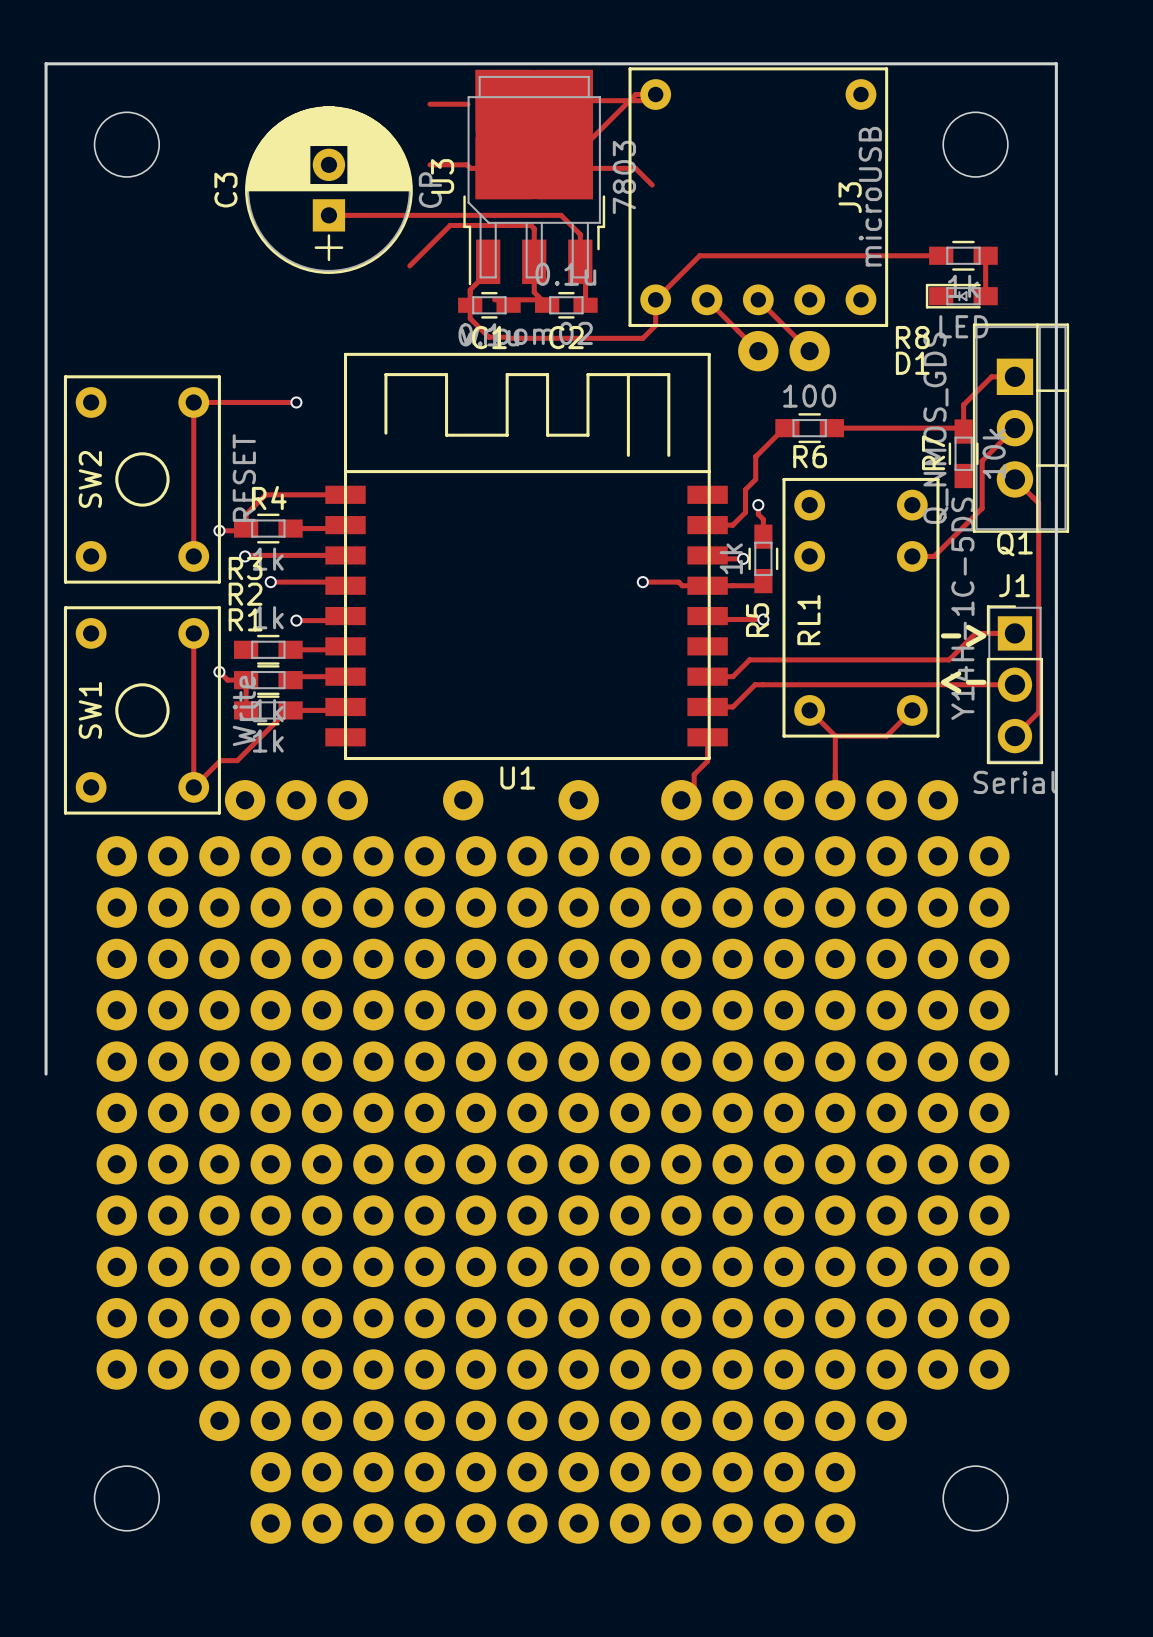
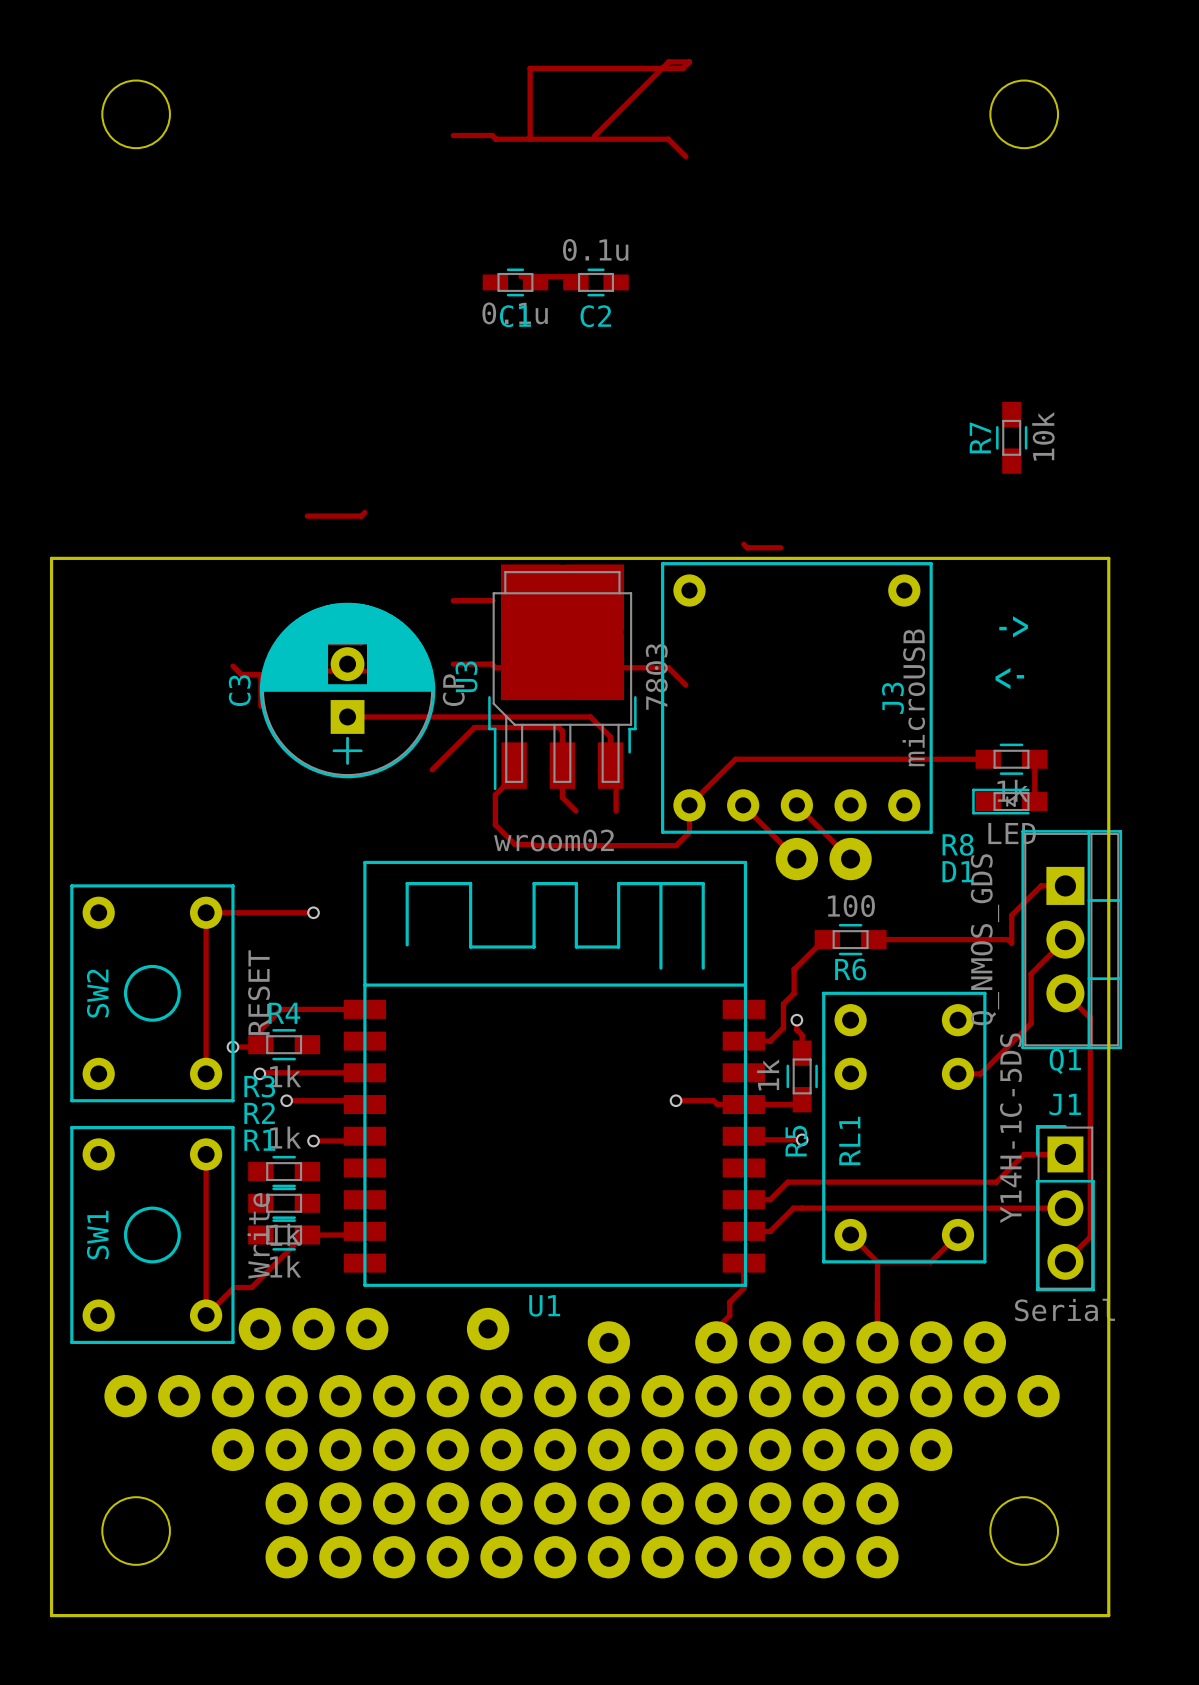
track: (429, 104) (467, 104) -> none
U3 position: (534, 177) -> (562, 677)
C3 position: (328, 190) -> (347, 690)
J3 position: (758, 197) -> (796, 697)
track: (328, 215) (561, 215) (580, 234) (580, 261) (585, 267) (585, 305) -> none
track: (941, 255) (699, 255) (655, 299) (655, 325) (642, 338) (488, 337) (470, 318) (470, 289) (488, 271) (488, 261) -> none
R8 position: (963, 255) -> (1011, 759)
track: (985, 255) (985, 296) -> none
track: (409, 265) (450, 225) (531, 225) (534, 228) (534, 292) (547, 305) -> none
D1 position: (961, 296) -> (1009, 801)
track: (707, 299) (758, 351) -> none
track: (758, 299) (809, 351) -> none
part: (758, 351) -> none
part: (809, 351) -> none
track: (1014, 376) (991, 376) (963, 404) (963, 431) (960, 428) (831, 428) -> none
track: (296, 402) (193, 402) (193, 556) -> none
via: (296, 402) -> none
track: (787, 428) (784, 428) (756, 456) -> none
R6 position: (809, 428) -> (850, 939)
track: (1014, 428) (982, 460) (982, 508) (934, 556) (912, 556) -> none
Q1 position: (1021, 428) -> (1071, 939)
track: (755, 456) (755, 479) (745, 489) (745, 512) (732, 525) (707, 525) -> none
SW2 position: (142, 479) -> (152, 993)
track: (1014, 479) (1038, 503) (1038, 712) (1014, 736) -> none
track: (345, 494) (265, 494) (246, 514) (246, 528) (243, 530) (219, 530) -> none
track: (758, 505) (758, 514) (763, 519) (763, 536) -> none
via: (758, 505) -> none
R4 position: (268, 528) -> (284, 1044)
via: (219, 530) -> none
track: (345, 555) (245, 556) -> none
via: (245, 556) -> none
U1 position: (526, 556) -> (554, 1073)
via: (743, 558) -> none
R5 position: (763, 558) -> (802, 1076)
board edge: (46, 568) (46, 63) (1056, 63) (1056, 568) -> (51, 558) (1108, 558)
track: (763, 581) (761, 585) (682, 585) (678, 582) (642, 582) -> none
track: (270, 582) (341, 582) (345, 585) -> none
via: (270, 582) -> none
via: (642, 582) -> none
RL1 position: (860, 607) -> (904, 1127)
track: none -> (453, 600) (493, 600)
track: (345, 616) (340, 620) (296, 620) -> none
track: (707, 616) (711, 619) (763, 619) -> none
via: (763, 619) -> none
via: (296, 620) -> none
track: (193, 633) (193, 787) (220, 760) (237, 760) (287, 710) (342, 710) (345, 706) -> none
track: (1014, 633) (975, 633) (949, 659) (749, 659) (732, 676) (707, 676) -> none
R3 position: (268, 649) -> (284, 1171)
track: none -> (453, 664) (492, 664) (495, 667) (668, 667) (685, 685)
via: (219, 671) -> none
R2 position: (268, 680) -> (284, 1203)
track: (1014, 684) (755, 684) (732, 706) (707, 706) -> none
J1 position: (1014, 684) -> (1065, 1208)
SW1 position: (142, 710) -> (152, 1235)
R1 position: (268, 710) -> (284, 1235)
track: (809, 710) (835, 736) -> none
track: (912, 710) (886, 736) (835, 736) -> none
track: none -> (347, 716) (590, 716) (610, 737) (610, 765) (616, 771) (616, 811)
track: (835, 736) (835, 800) -> none
track: (707, 737) (707, 761) (694, 774) (694, 787) (681, 800) -> none
track: none -> (988, 759) (735, 759) (689, 805) (689, 832) (676, 845) (514, 844) (495, 824) (495, 794) (514, 776) (514, 765)
track: none -> (1034, 759) (1034, 801)
track: none -> (432, 769) (474, 727) (559, 727) (562, 730) (562, 797) (575, 811)
part: (245, 800) -> none
part: (296, 800) -> none
part: (347, 800) -> none
part: (463, 800) -> none
part: (578, 800) -> none
part: (681, 800) -> none
part: (732, 800) -> none
part: (783, 800) -> none
part: (835, 800) -> none
part: (886, 800) -> none
part: (937, 800) -> none
track: none -> (743, 805) (796, 859)
track: none -> (796, 805) (850, 859)
part: (116, 856) -> none
part: (168, 856) -> none
part: (219, 856) -> none
part: (270, 856) -> none
part: (322, 856) -> none
part: (373, 856) -> none
part: (424, 856) -> none
part: (476, 856) -> none
part: (527, 856) -> none
part: (578, 856) -> none
part: (630, 856) -> none
part: (681, 856) -> none
part: (732, 856) -> none
part: none -> (796, 859)
part: (783, 856) -> none
part: none -> (850, 859)
part: (835, 856) -> none
part: (886, 856) -> none
part: (937, 856) -> none
part: (989, 856) -> none
track: none -> (1065, 885) (1041, 885) (1011, 915) (1011, 943) (1008, 939) (873, 939)
part: (116, 907) -> none
part: (168, 907) -> none
part: (219, 907) -> none
part: (270, 907) -> none
track: none -> (313, 912) (206, 912) (206, 1073)
via: none -> (313, 912)
part: (322, 907) -> none
part: (373, 907) -> none
part: (424, 907) -> none
part: (476, 907) -> none
part: (527, 907) -> none
part: (578, 907) -> none
part: (630, 907) -> none
part: (681, 907) -> none
part: (732, 907) -> none
part: (783, 907) -> none
part: (835, 907) -> none
part: (886, 907) -> none
part: (937, 907) -> none
part: (989, 907) -> none
track: none -> (827, 939) (824, 939) (794, 969)
track: none -> (1065, 939) (1031, 973) (1031, 1023) (980, 1073) (958, 1073)
part: (116, 958) -> none
part: (168, 958) -> none
part: (219, 958) -> none
part: (270, 958) -> none
part: (322, 958) -> none
part: (373, 958) -> none
part: (424, 958) -> none
part: (476, 958) -> none
part: (527, 958) -> none
part: (578, 958) -> none
part: (630, 958) -> none
part: (681, 958) -> none
part: (732, 958) -> none
part: (783, 958) -> none
part: (835, 958) -> none
part: (886, 958) -> none
part: (937, 958) -> none
part: (989, 958) -> none
track: none -> (794, 969) (794, 993) (783, 1004) (783, 1027) (770, 1041) (743, 1041)
track: none -> (1065, 993) (1090, 1018) (1090, 1237) (1065, 1261)
track: none -> (364, 1009) (281, 1009) (260, 1029) (260, 1044) (258, 1047) (232, 1047)
part: (116, 1010) -> none
part: (168, 1010) -> none
part: (219, 1010) -> none
part: (270, 1010) -> none
part: (322, 1010) -> none
part: (373, 1010) -> none
part: (424, 1010) -> none
part: (476, 1010) -> none
part: (527, 1010) -> none
part: (578, 1010) -> none
part: (630, 1010) -> none
part: (681, 1010) -> none
part: (732, 1010) -> none
track: none -> (796, 1020) (796, 1029) (802, 1035) (802, 1053)
via: none -> (796, 1020)
part: (783, 1010) -> none
part: (835, 1010) -> none
part: (886, 1010) -> none
part: (937, 1010) -> none
part: (989, 1010) -> none
via: none -> (232, 1047)
track: none -> (364, 1072) (259, 1073)
part: (116, 1061) -> none
part: (168, 1061) -> none
part: (219, 1061) -> none
via: none -> (259, 1073)
part: (270, 1061) -> none
part: (322, 1061) -> none
part: (373, 1061) -> none
part: (424, 1061) -> none
part: (476, 1061) -> none
part: (527, 1061) -> none
part: (578, 1061) -> none
part: (630, 1061) -> none
part: (681, 1061) -> none
part: (732, 1061) -> none
part: (783, 1061) -> none
part: (835, 1061) -> none
part: (886, 1061) -> none
part: (937, 1061) -> none
part: (989, 1061) -> none
board edge: none -> (51, 1086) (51, 1615) (1108, 1615) (1108, 1086)
track: none -> (802, 1099) (800, 1104) (717, 1104) (713, 1100) (676, 1100)
track: none -> (286, 1100) (361, 1100) (364, 1104)
via: none -> (286, 1100)
via: none -> (676, 1100)
part: (116, 1112) -> none
part: (168, 1112) -> none
part: (219, 1112) -> none
part: (270, 1112) -> none
part: (322, 1112) -> none
part: (373, 1112) -> none
part: (424, 1112) -> none
part: (476, 1112) -> none
part: (527, 1112) -> none
part: (578, 1112) -> none
part: (630, 1112) -> none
part: (681, 1112) -> none
part: (732, 1112) -> none
part: (783, 1112) -> none
part: (835, 1112) -> none
part: (886, 1112) -> none
part: (937, 1112) -> none
part: (989, 1112) -> none
track: none -> (364, 1136) (360, 1141) (313, 1141)
track: none -> (743, 1136) (747, 1139) (802, 1139)
via: none -> (802, 1139)
via: none -> (313, 1141)
track: none -> (206, 1154) (206, 1315) (234, 1287) (251, 1287) (304, 1235) (361, 1235) (364, 1231)
track: none -> (1065, 1154) (1024, 1154) (996, 1182) (787, 1182) (770, 1199) (743, 1199)
part: (116, 1164) -> none
part: (168, 1164) -> none
part: (219, 1164) -> none
part: (270, 1164) -> none
part: (322, 1164) -> none
part: (373, 1164) -> none
part: (424, 1164) -> none
part: (476, 1164) -> none
part: (527, 1164) -> none
part: (578, 1164) -> none
part: (630, 1164) -> none
part: (681, 1164) -> none
part: (732, 1164) -> none
part: (783, 1164) -> none
part: (835, 1164) -> none
part: (886, 1164) -> none
part: (937, 1164) -> none
part: (989, 1164) -> none
track: none -> (1065, 1208) (793, 1208) (770, 1231) (743, 1231)
part: (116, 1215) -> none
part: (168, 1215) -> none
part: (219, 1215) -> none
part: (270, 1215) -> none
part: (322, 1215) -> none
part: (373, 1215) -> none
part: (424, 1215) -> none
part: (476, 1215) -> none
part: (527, 1215) -> none
part: (578, 1215) -> none
part: (630, 1215) -> none
part: (681, 1215) -> none
part: (732, 1215) -> none
part: (783, 1215) -> none
track: none -> (850, 1235) (877, 1261)
part: (835, 1215) -> none
part: (886, 1215) -> none
track: none -> (958, 1235) (931, 1261) (877, 1261)
part: (937, 1215) -> none
part: (989, 1215) -> none
track: none -> (877, 1261) (877, 1328)
track: none -> (743, 1263) (743, 1288) (729, 1302) (729, 1315) (716, 1328)
part: (116, 1266) -> none
part: (168, 1266) -> none
part: (219, 1266) -> none
part: (270, 1266) -> none
part: (322, 1266) -> none
part: (373, 1266) -> none
part: (424, 1266) -> none
part: (476, 1266) -> none
part: (527, 1266) -> none
part: (578, 1266) -> none
part: (630, 1266) -> none
part: (681, 1266) -> none
part: (732, 1266) -> none
part: (783, 1266) -> none
part: (835, 1266) -> none
part: (886, 1266) -> none
part: (937, 1266) -> none
part: (989, 1266) -> none
part: none -> (259, 1328)
part: none -> (313, 1328)
part: none -> (367, 1328)
part: (116, 1318) -> none
part: (168, 1318) -> none
part: (219, 1318) -> none
part: (270, 1318) -> none
part: (322, 1318) -> none
part: (373, 1318) -> none
part: (424, 1318) -> none
part position: (476, 1318) -> (488, 1328)
part: (527, 1318) -> none
part: (630, 1318) -> none
part: (989, 1318) -> none

